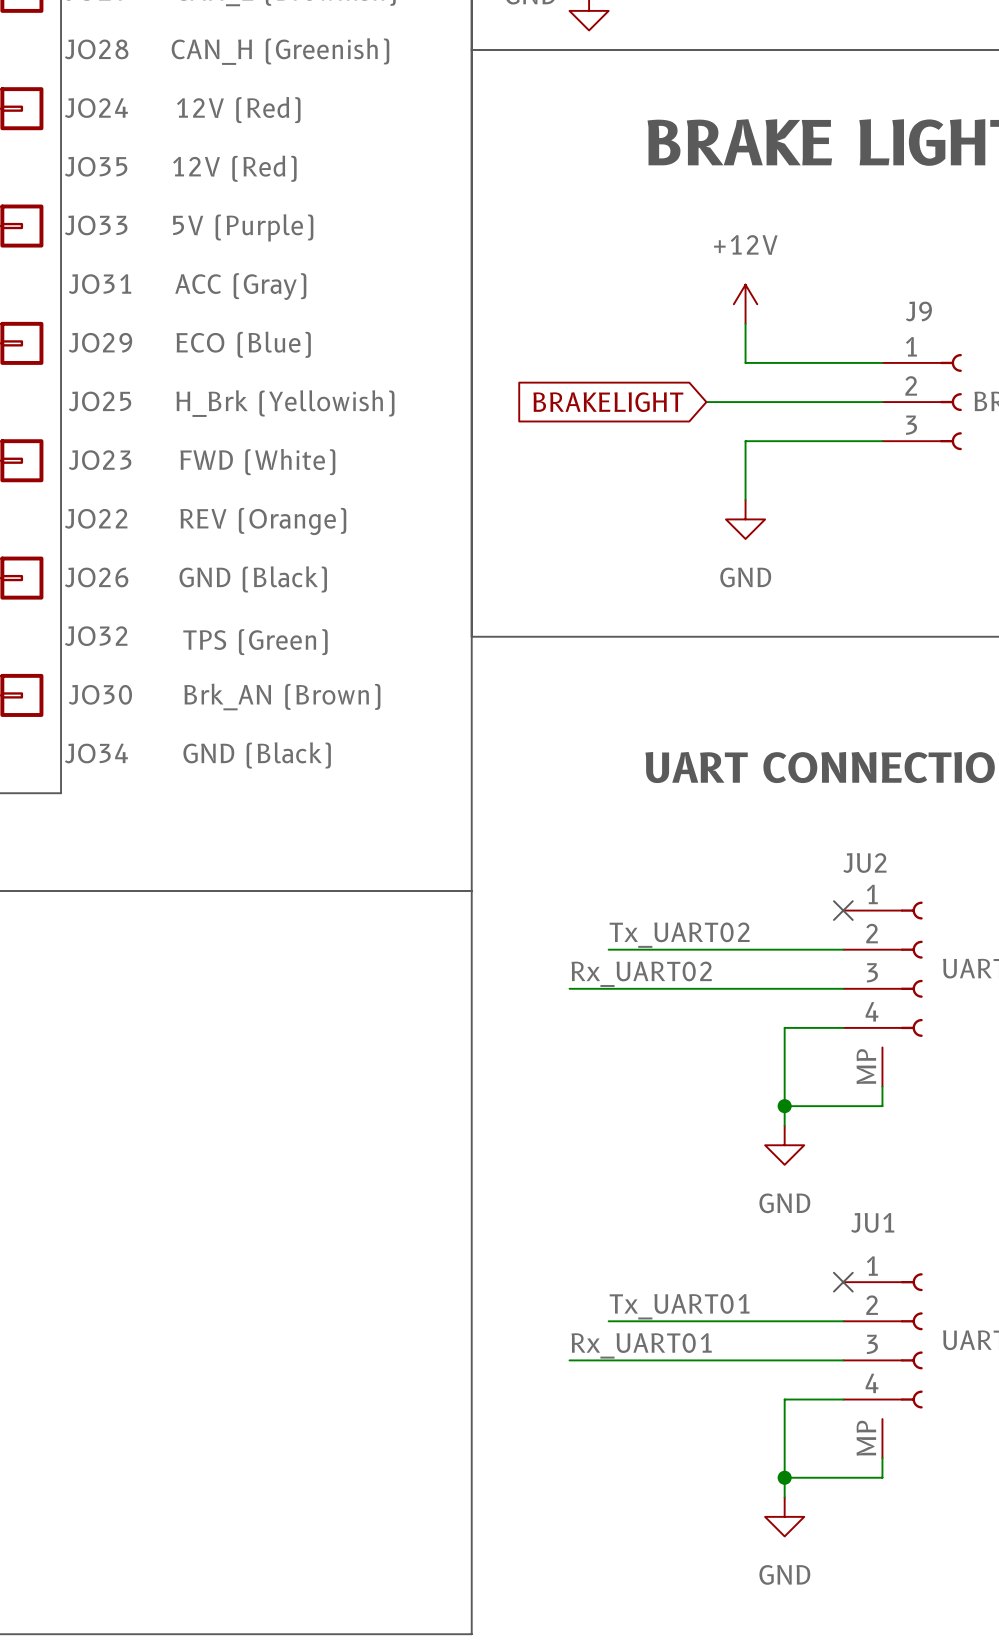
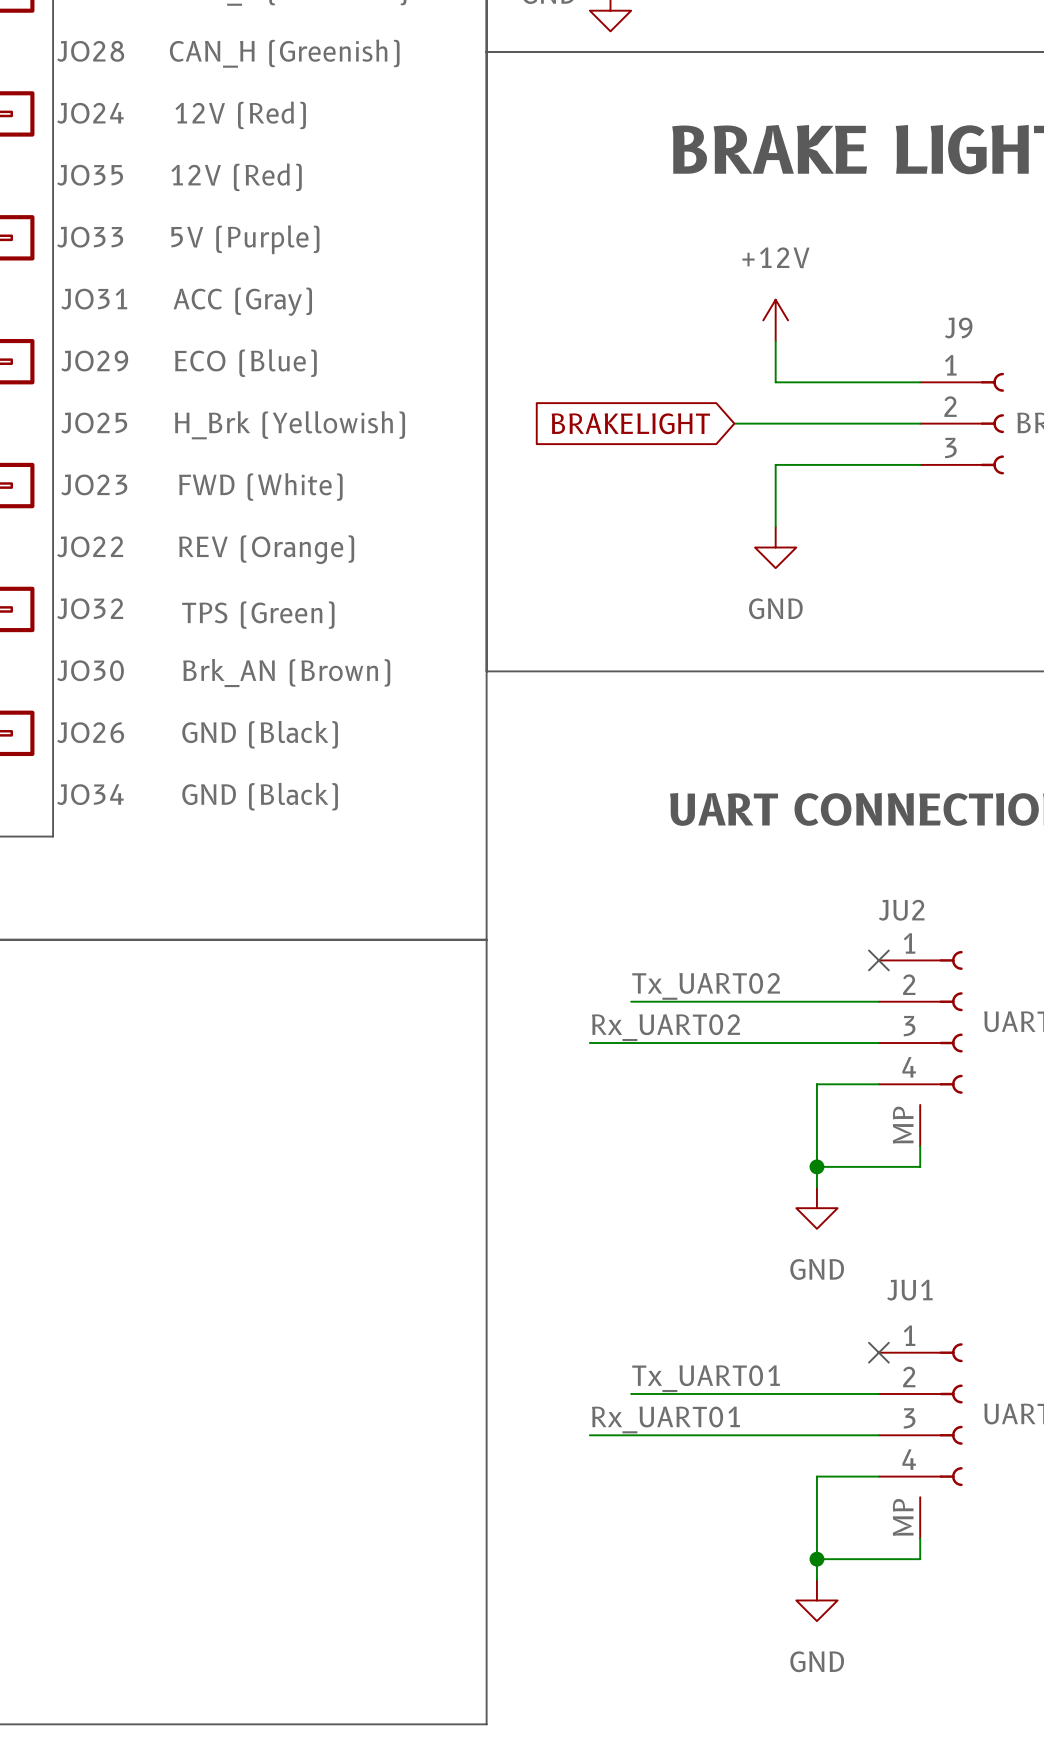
JO26 name: JO26 (96, 577) -> JO32 (90, 608)
JO26 value: GND (Black) (253, 579) -> TPS (Green) (258, 615)
JO32 name: JO32 (96, 636) -> JO30 (90, 670)
JO32 value: TPS (Green) (255, 642) -> Brk_AN (Brown) (286, 673)
JO30 name: JO30 (100, 694) -> JO26 (90, 732)
JO30 value: Brk_AN (Brown) (282, 696) -> GND (Black) (260, 734)

